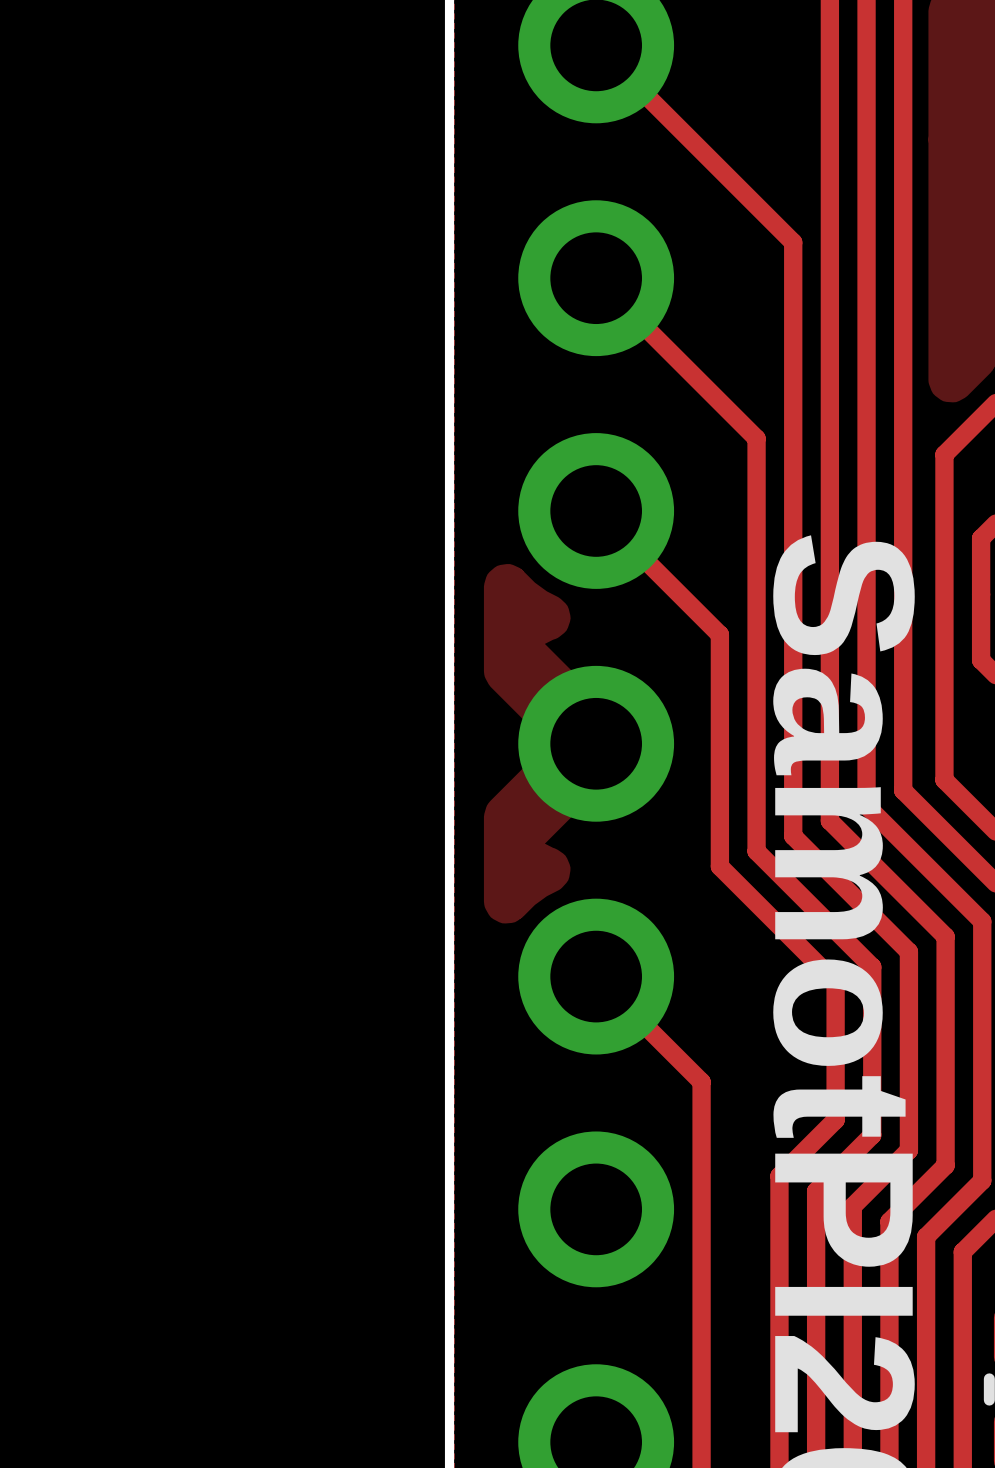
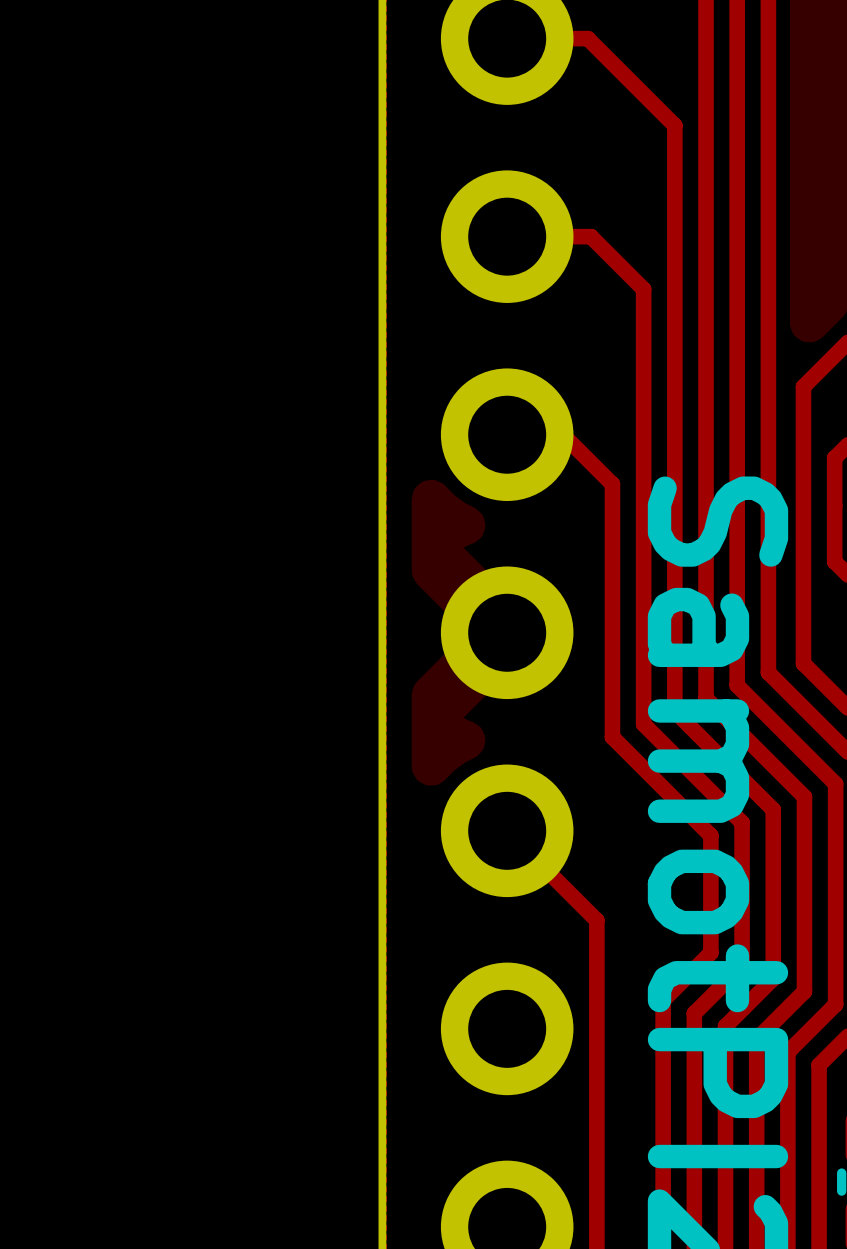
track: (596, 45) (793, 242) -> (507, 38) (587, 38) (674, 125) (674, 206)
track: (596, 278) (756, 438) -> (507, 236) (591, 236) (643, 289) (643, 373)
track: (596, 510) (719, 634) -> (507, 434) (562, 434) (612, 484) (612, 539)

